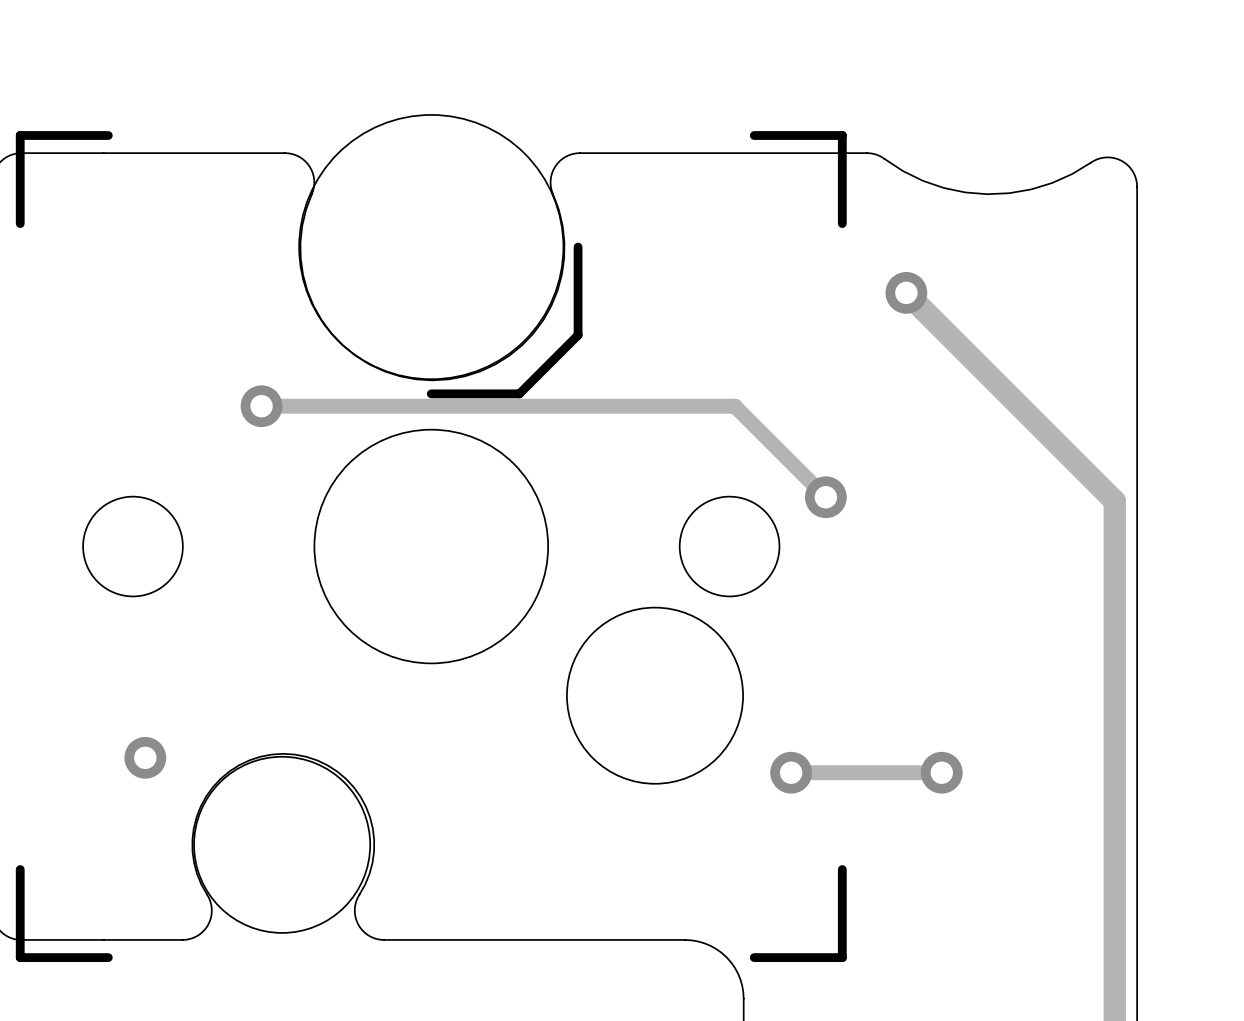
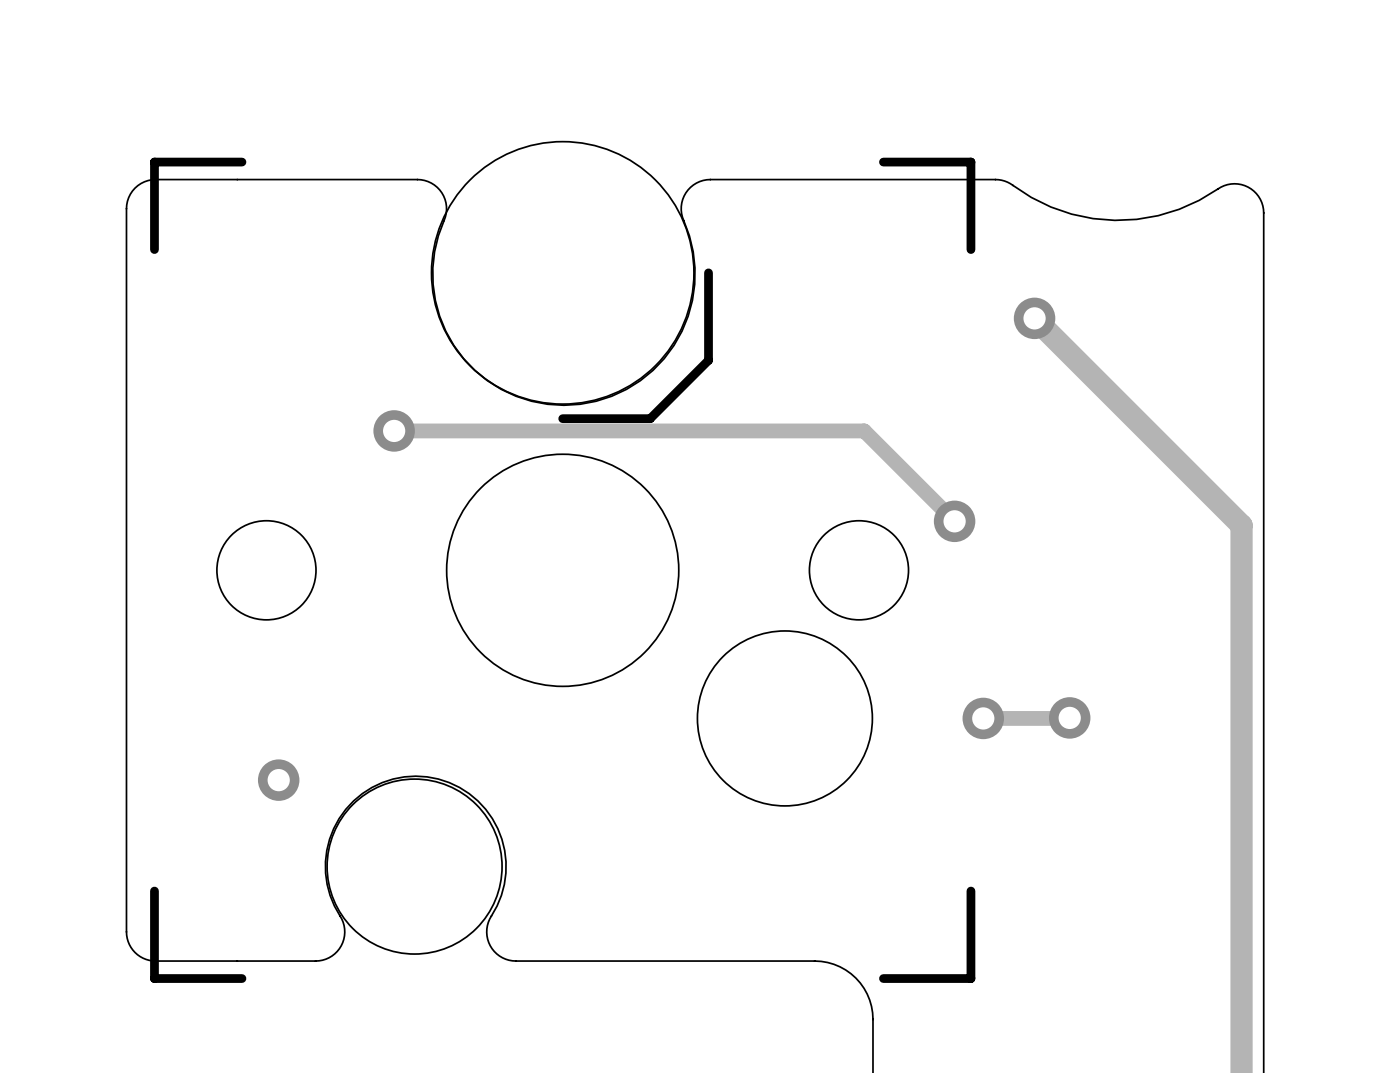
track: none -> (983, 718) (1069, 718)
via: none -> (983, 718)
via: none -> (1069, 717)
track: (791, 772) (941, 772) -> none
via: (791, 772) -> none
via: (941, 772) -> none

